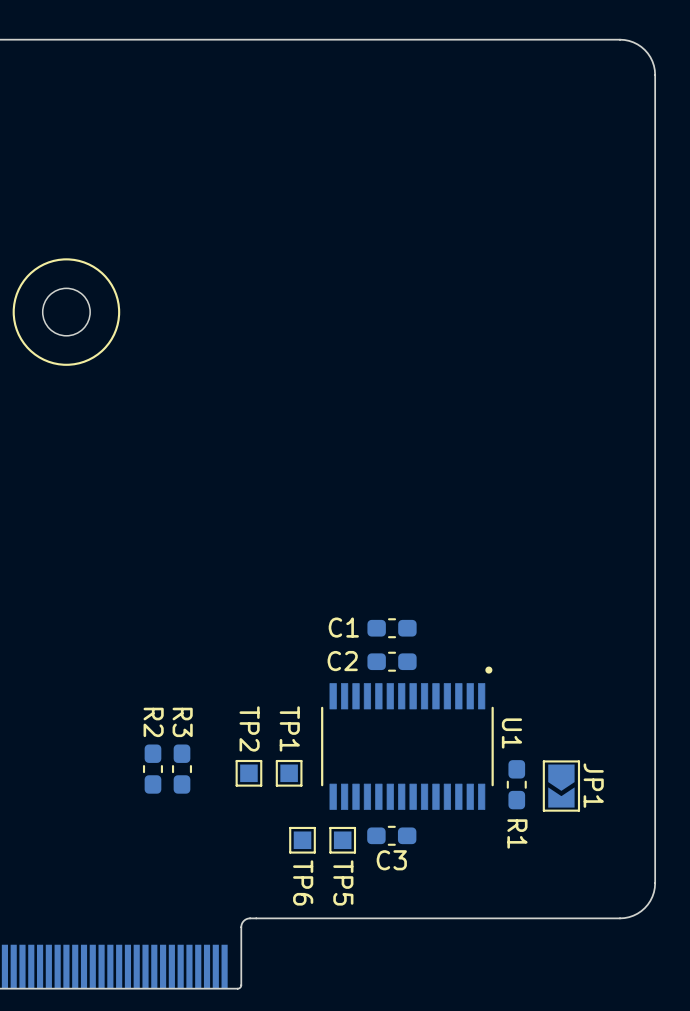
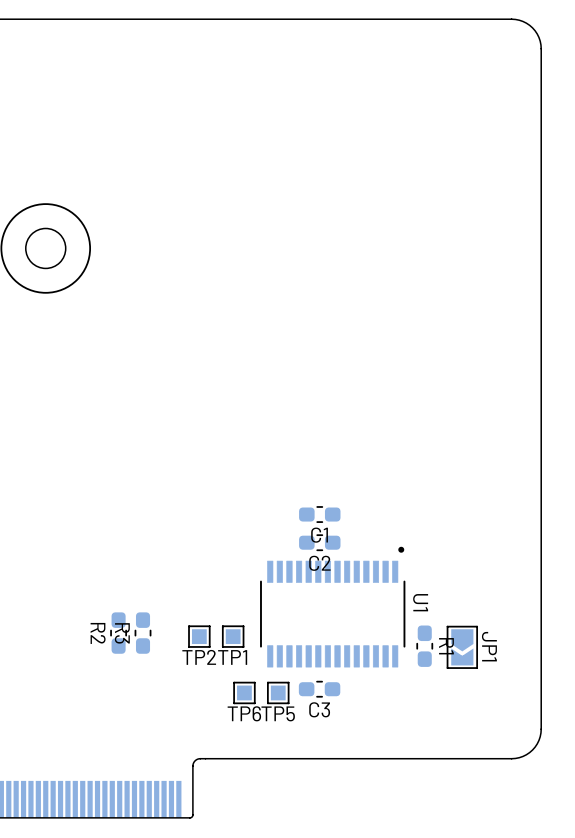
C1 name position: C1 (343, 627) -> C1 (319, 535)
C2 name position: C2 (342, 661) -> C2 (319, 563)
R2 name position: R2 (153, 722) -> R2 (98, 633)
R3 name position: R3 (182, 722) -> R3 (122, 633)
TP2 name rotation: 0° (249, 728) -> 90° counterclockwise (199, 657)
TP2 name position: TP2 (249, 728) -> TP2 (199, 657)
TP1 name rotation: 0° (289, 728) -> 90° counterclockwise (232, 657)
TP1 name position: TP1 (289, 728) -> TP1 (232, 657)
R1 name position: R1 (517, 833) -> R1 (446, 646)
TP6 name rotation: 0° (303, 882) -> 90° counterclockwise (244, 713)
TP5 name rotation: 0° (343, 882) -> 90° counterclockwise (278, 713)

